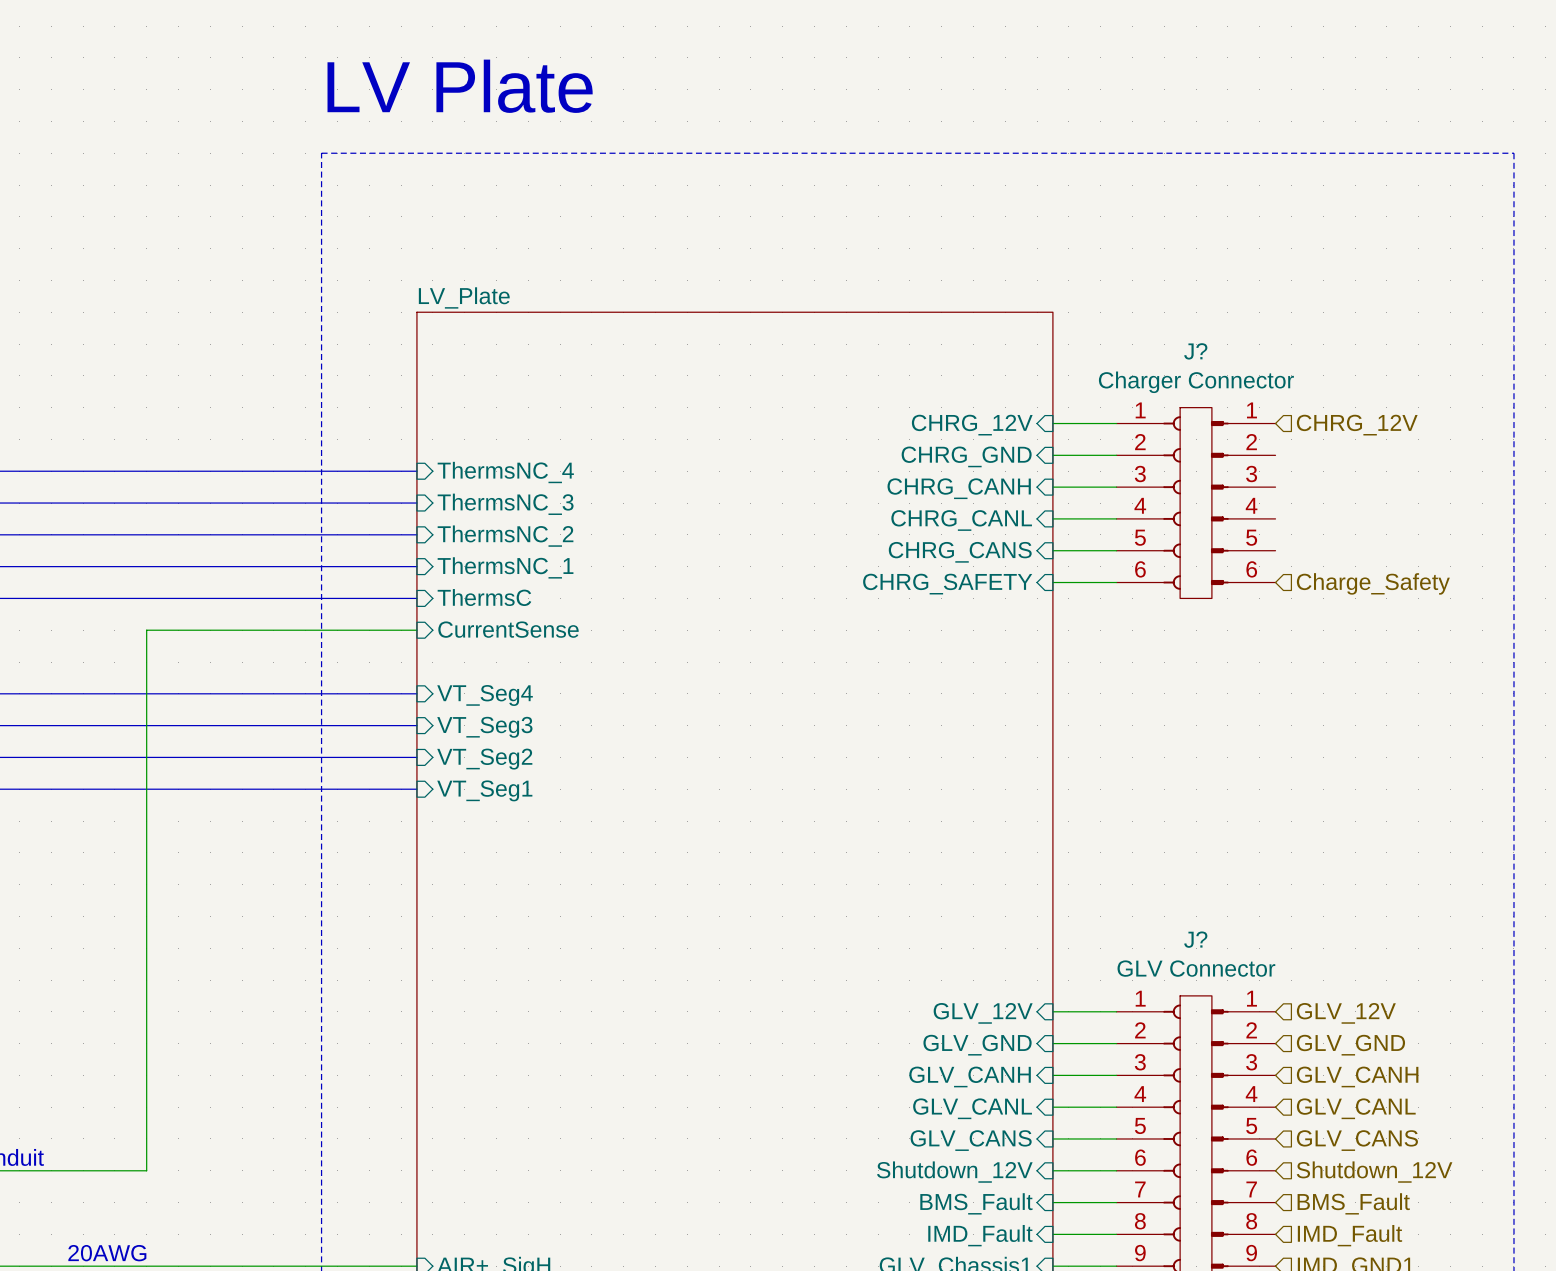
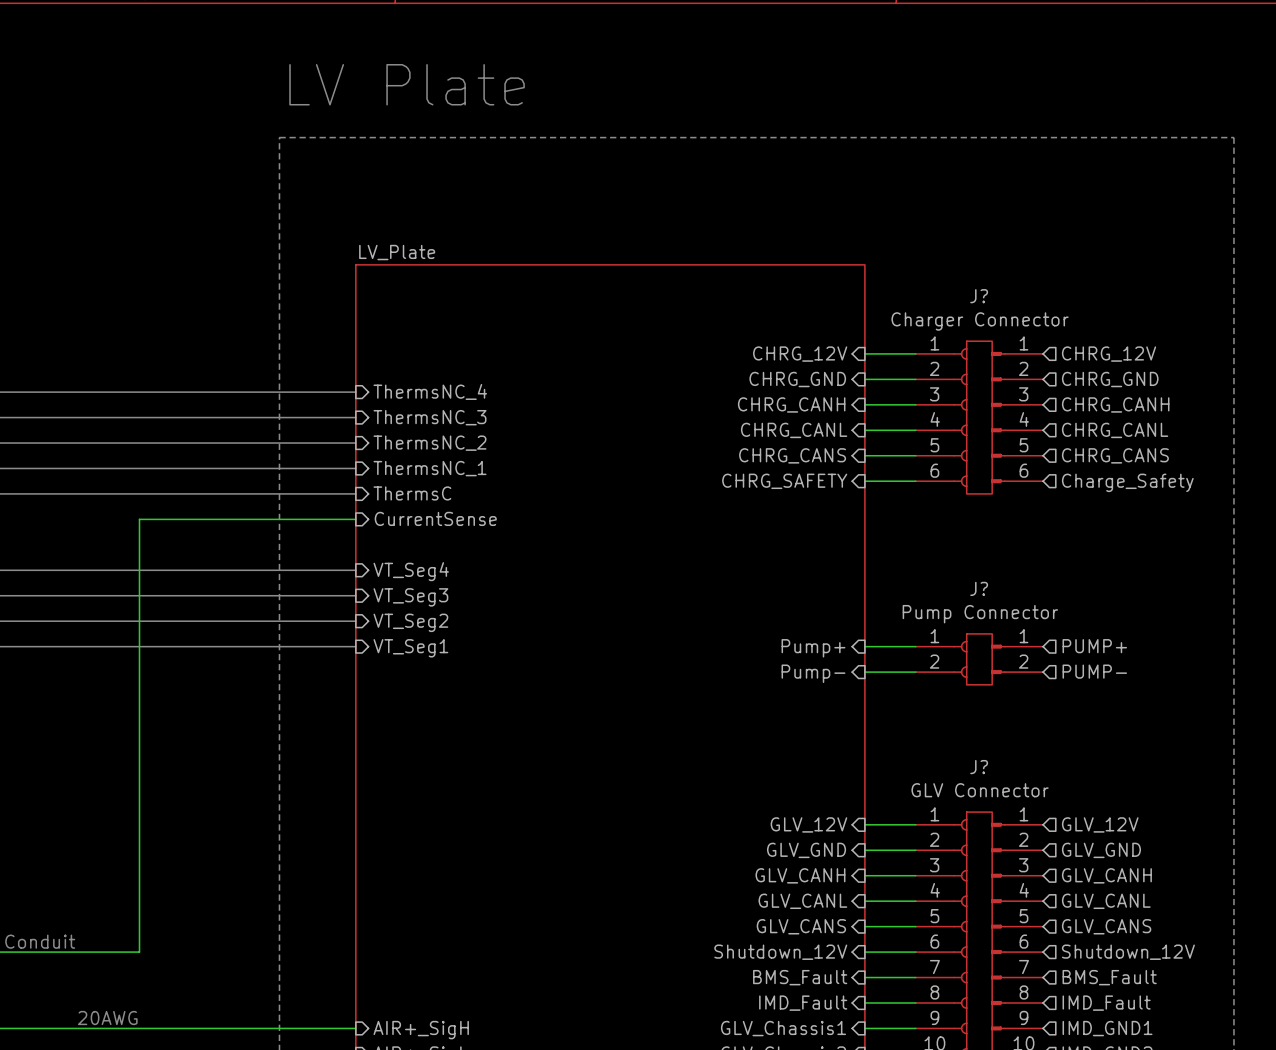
hierarchical label: none -> CHRG_GND (1110, 379)
hierarchical label: none -> CHRG_CANH (1115, 404)
hierarchical label: none -> CHRG_CANL (1115, 430)
hierarchical label: none -> CHRG_CANS (1115, 455)
hierarchical label: none -> PUMP+ (1094, 646)
wire: none -> (864, 646) (915, 646)
sheet pin: none -> Pump+ (813, 648)
J?: none -> Pump Connector (979, 659)
hierarchical label: none -> PUMP- (1094, 671)
wire: none -> (864, 672) (915, 672)
sheet pin: none -> Pump- (813, 673)

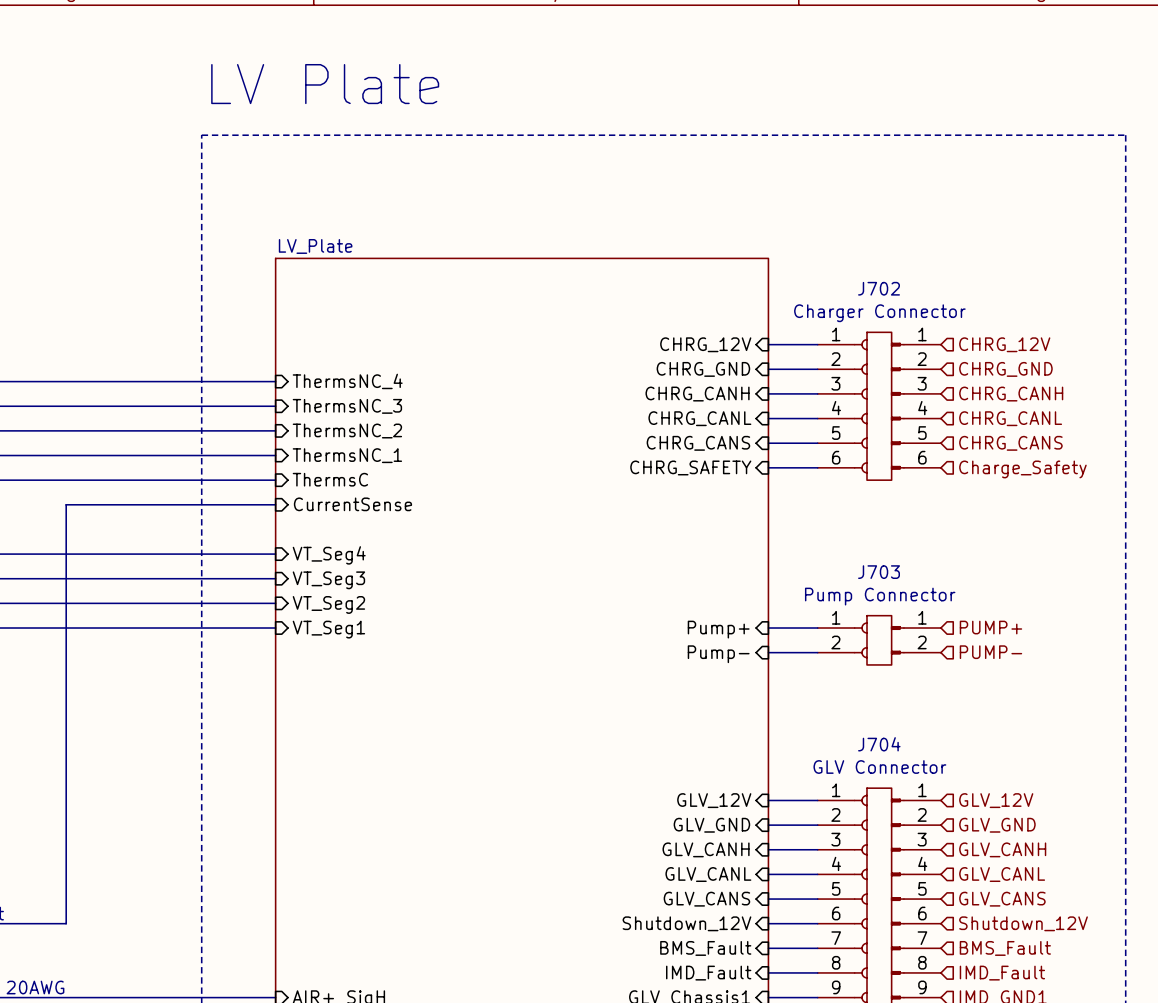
J? name: J? (979, 296) -> J702 (879, 288)
J? name: J? (979, 588) -> J703 (879, 572)
J? name: J? (979, 767) -> J704 (879, 744)

